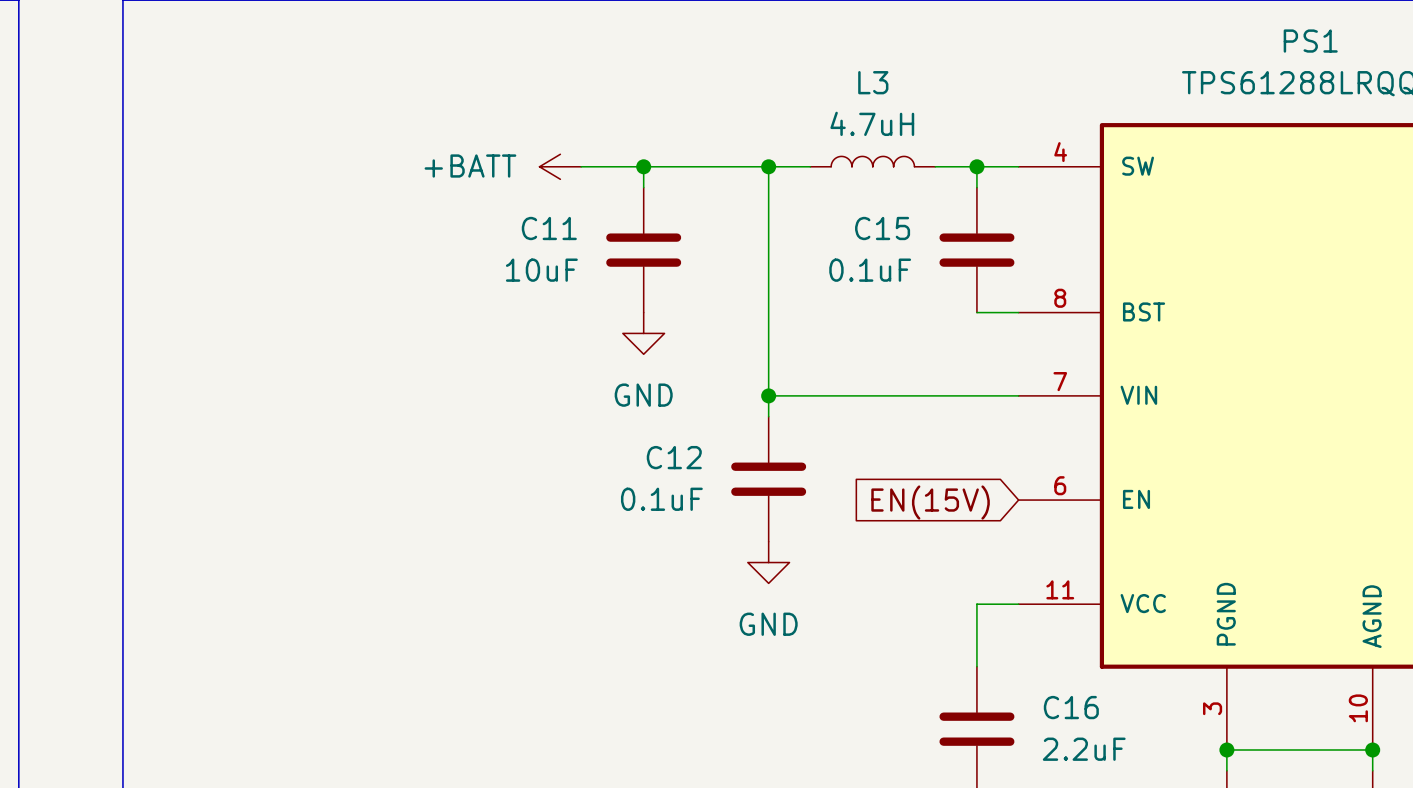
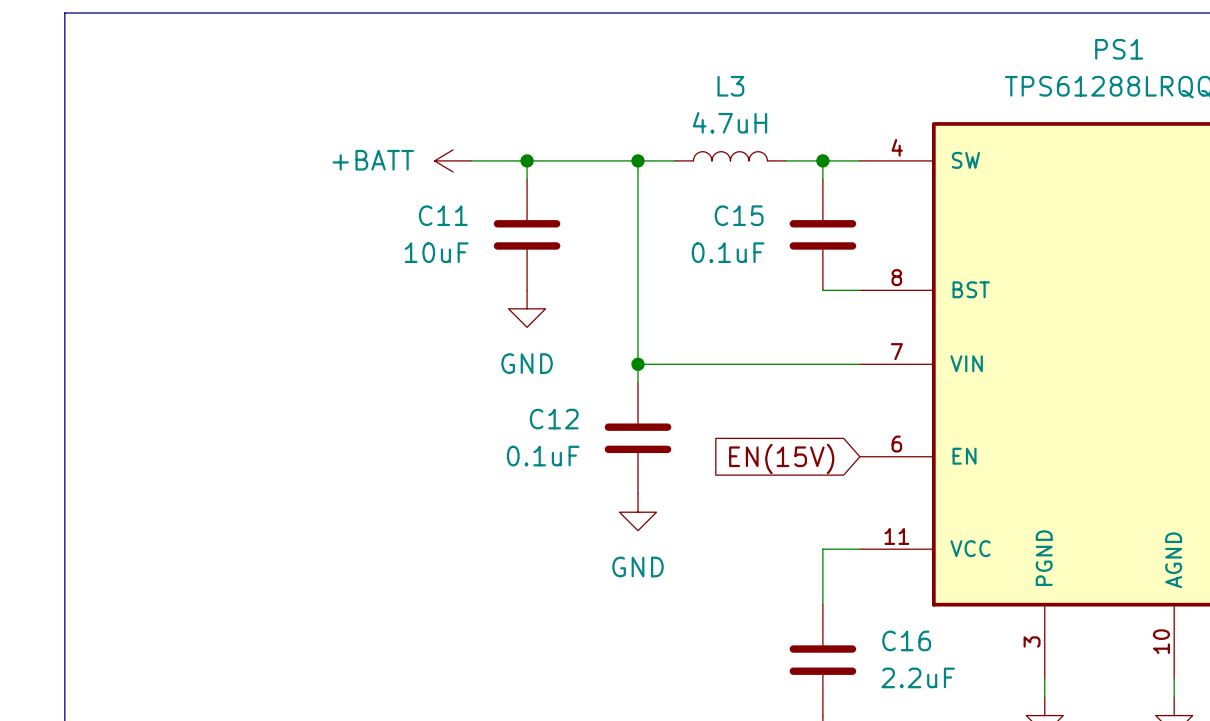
wire: (1226, 749) (1372, 749) -> none
junction: (1226, 749) -> none
junction: (1372, 749) -> none

